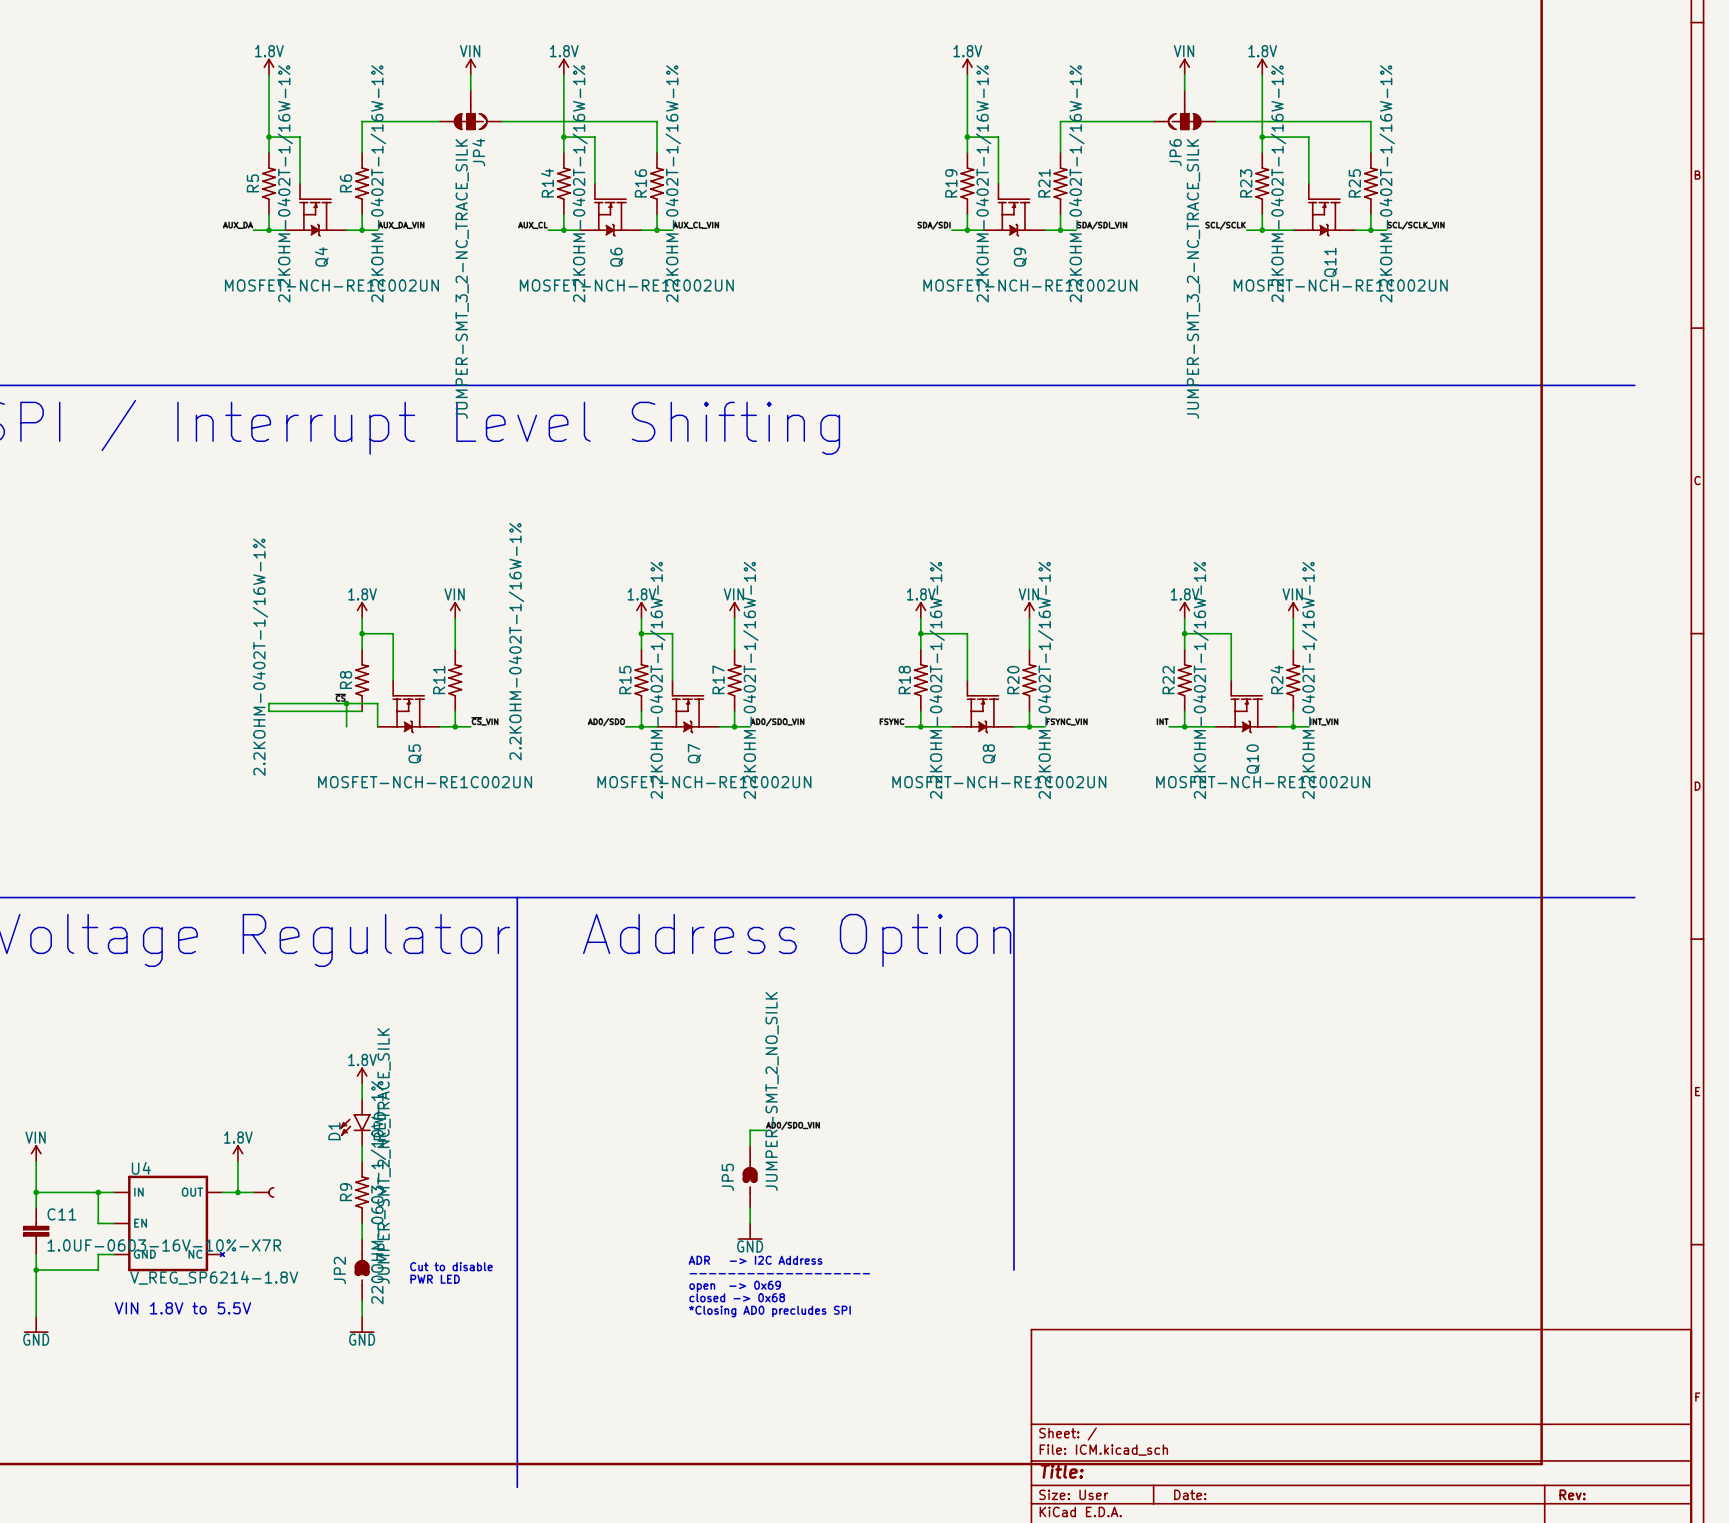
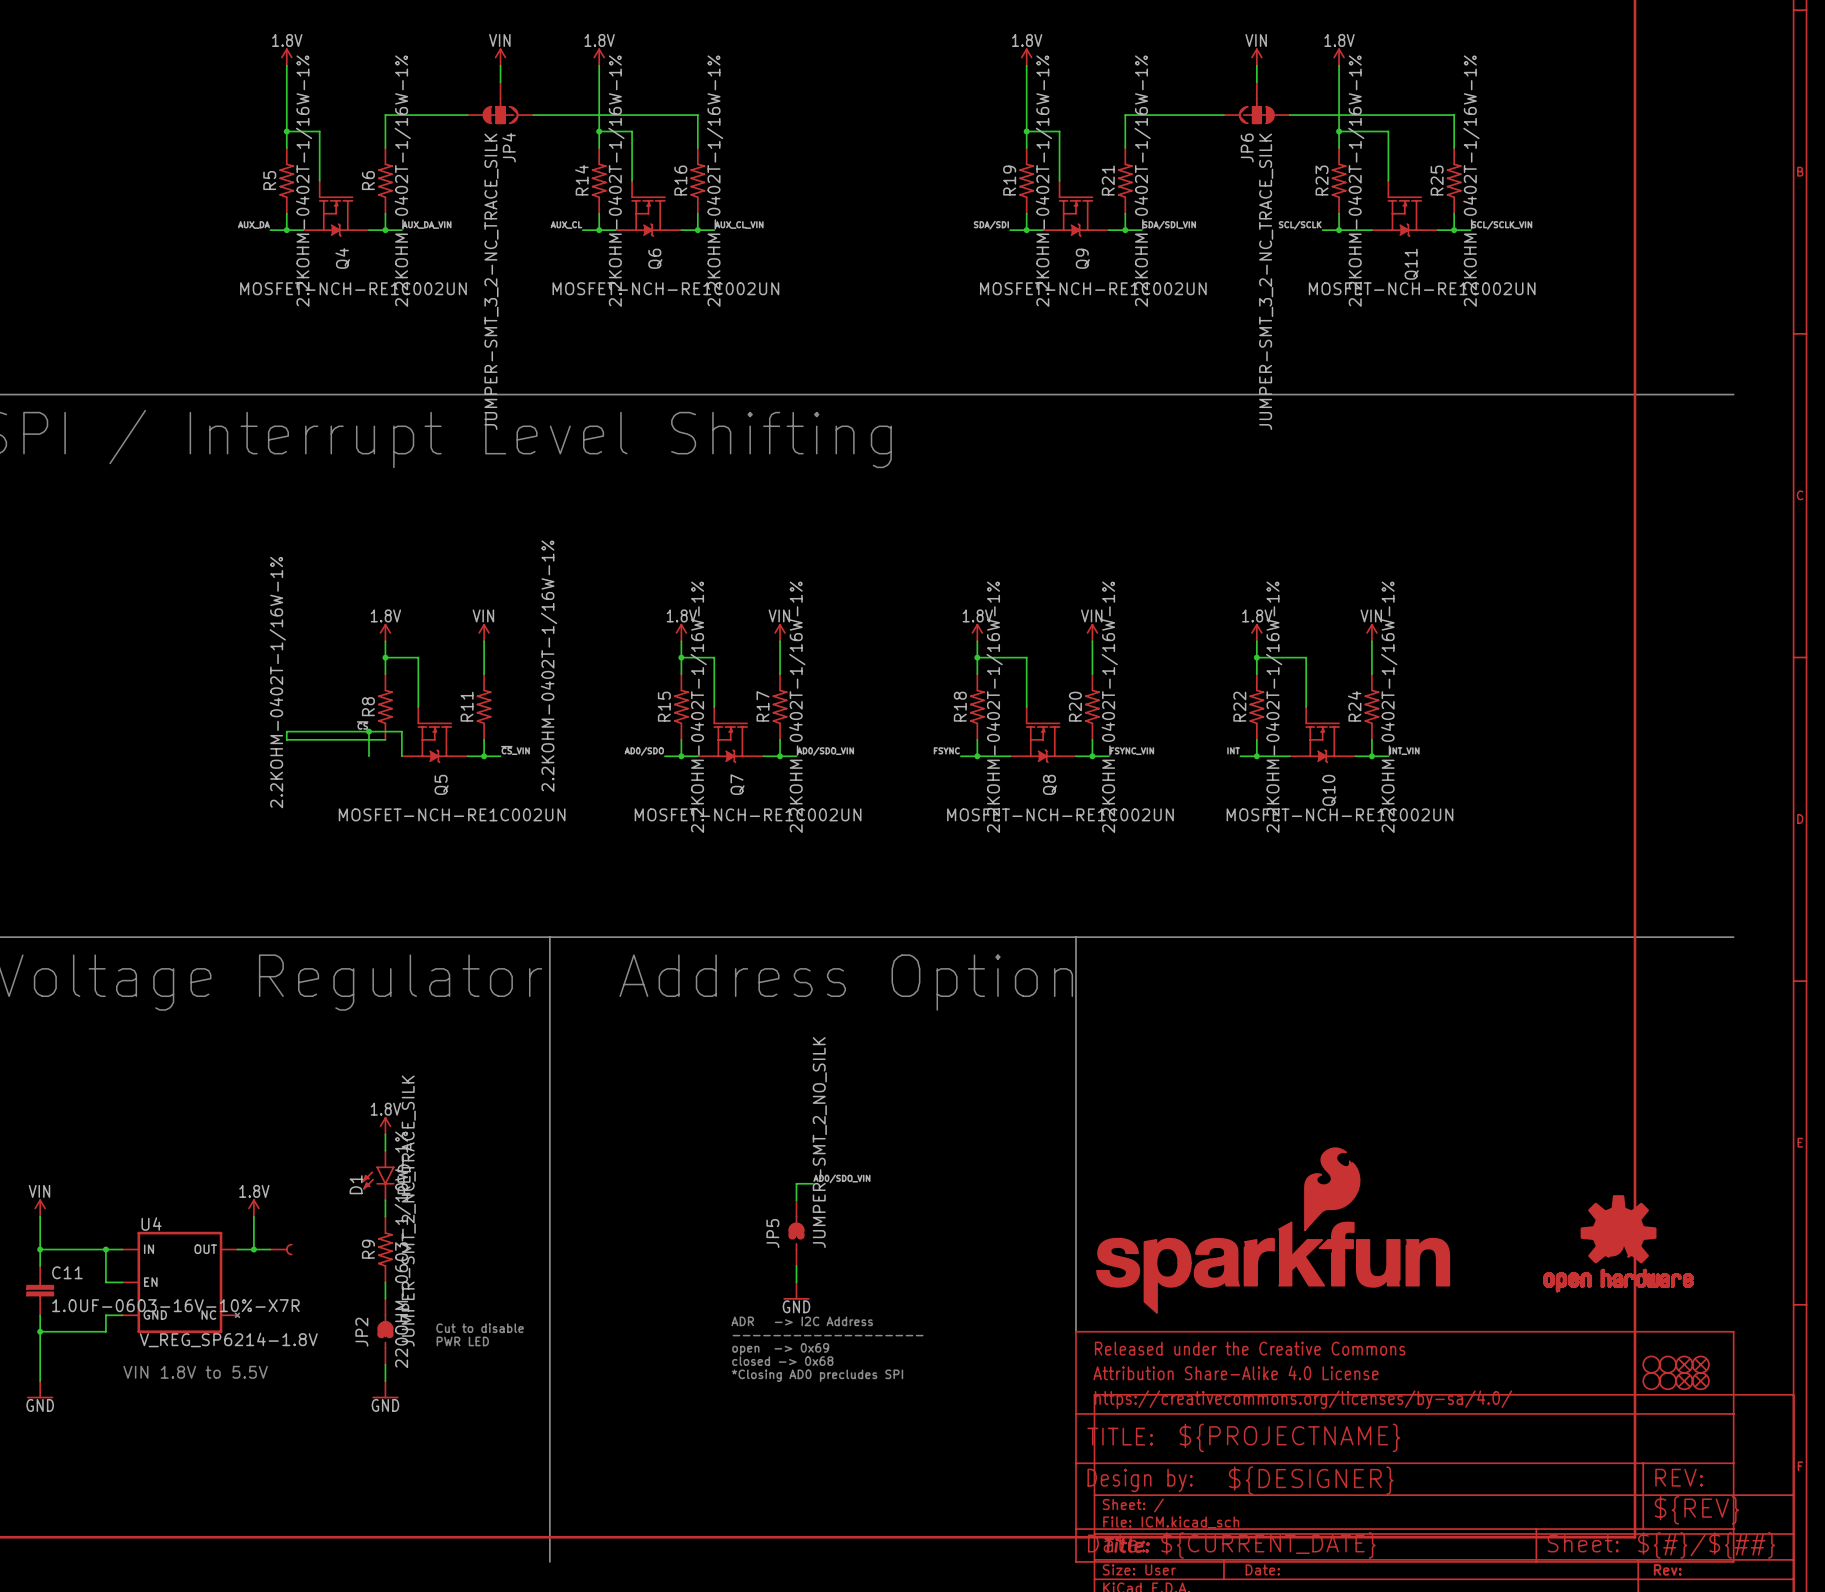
part: none -> (1273, 1230)
part: none -> (1618, 1243)
part: none -> (1651, 1364)
part: none -> (1667, 1364)
part: none -> (1684, 1364)
part: none -> (1700, 1364)
part: none -> (1651, 1381)
part: none -> (1667, 1381)
part: none -> (1684, 1381)
part: none -> (1700, 1381)
part: none -> (1404, 1446)

